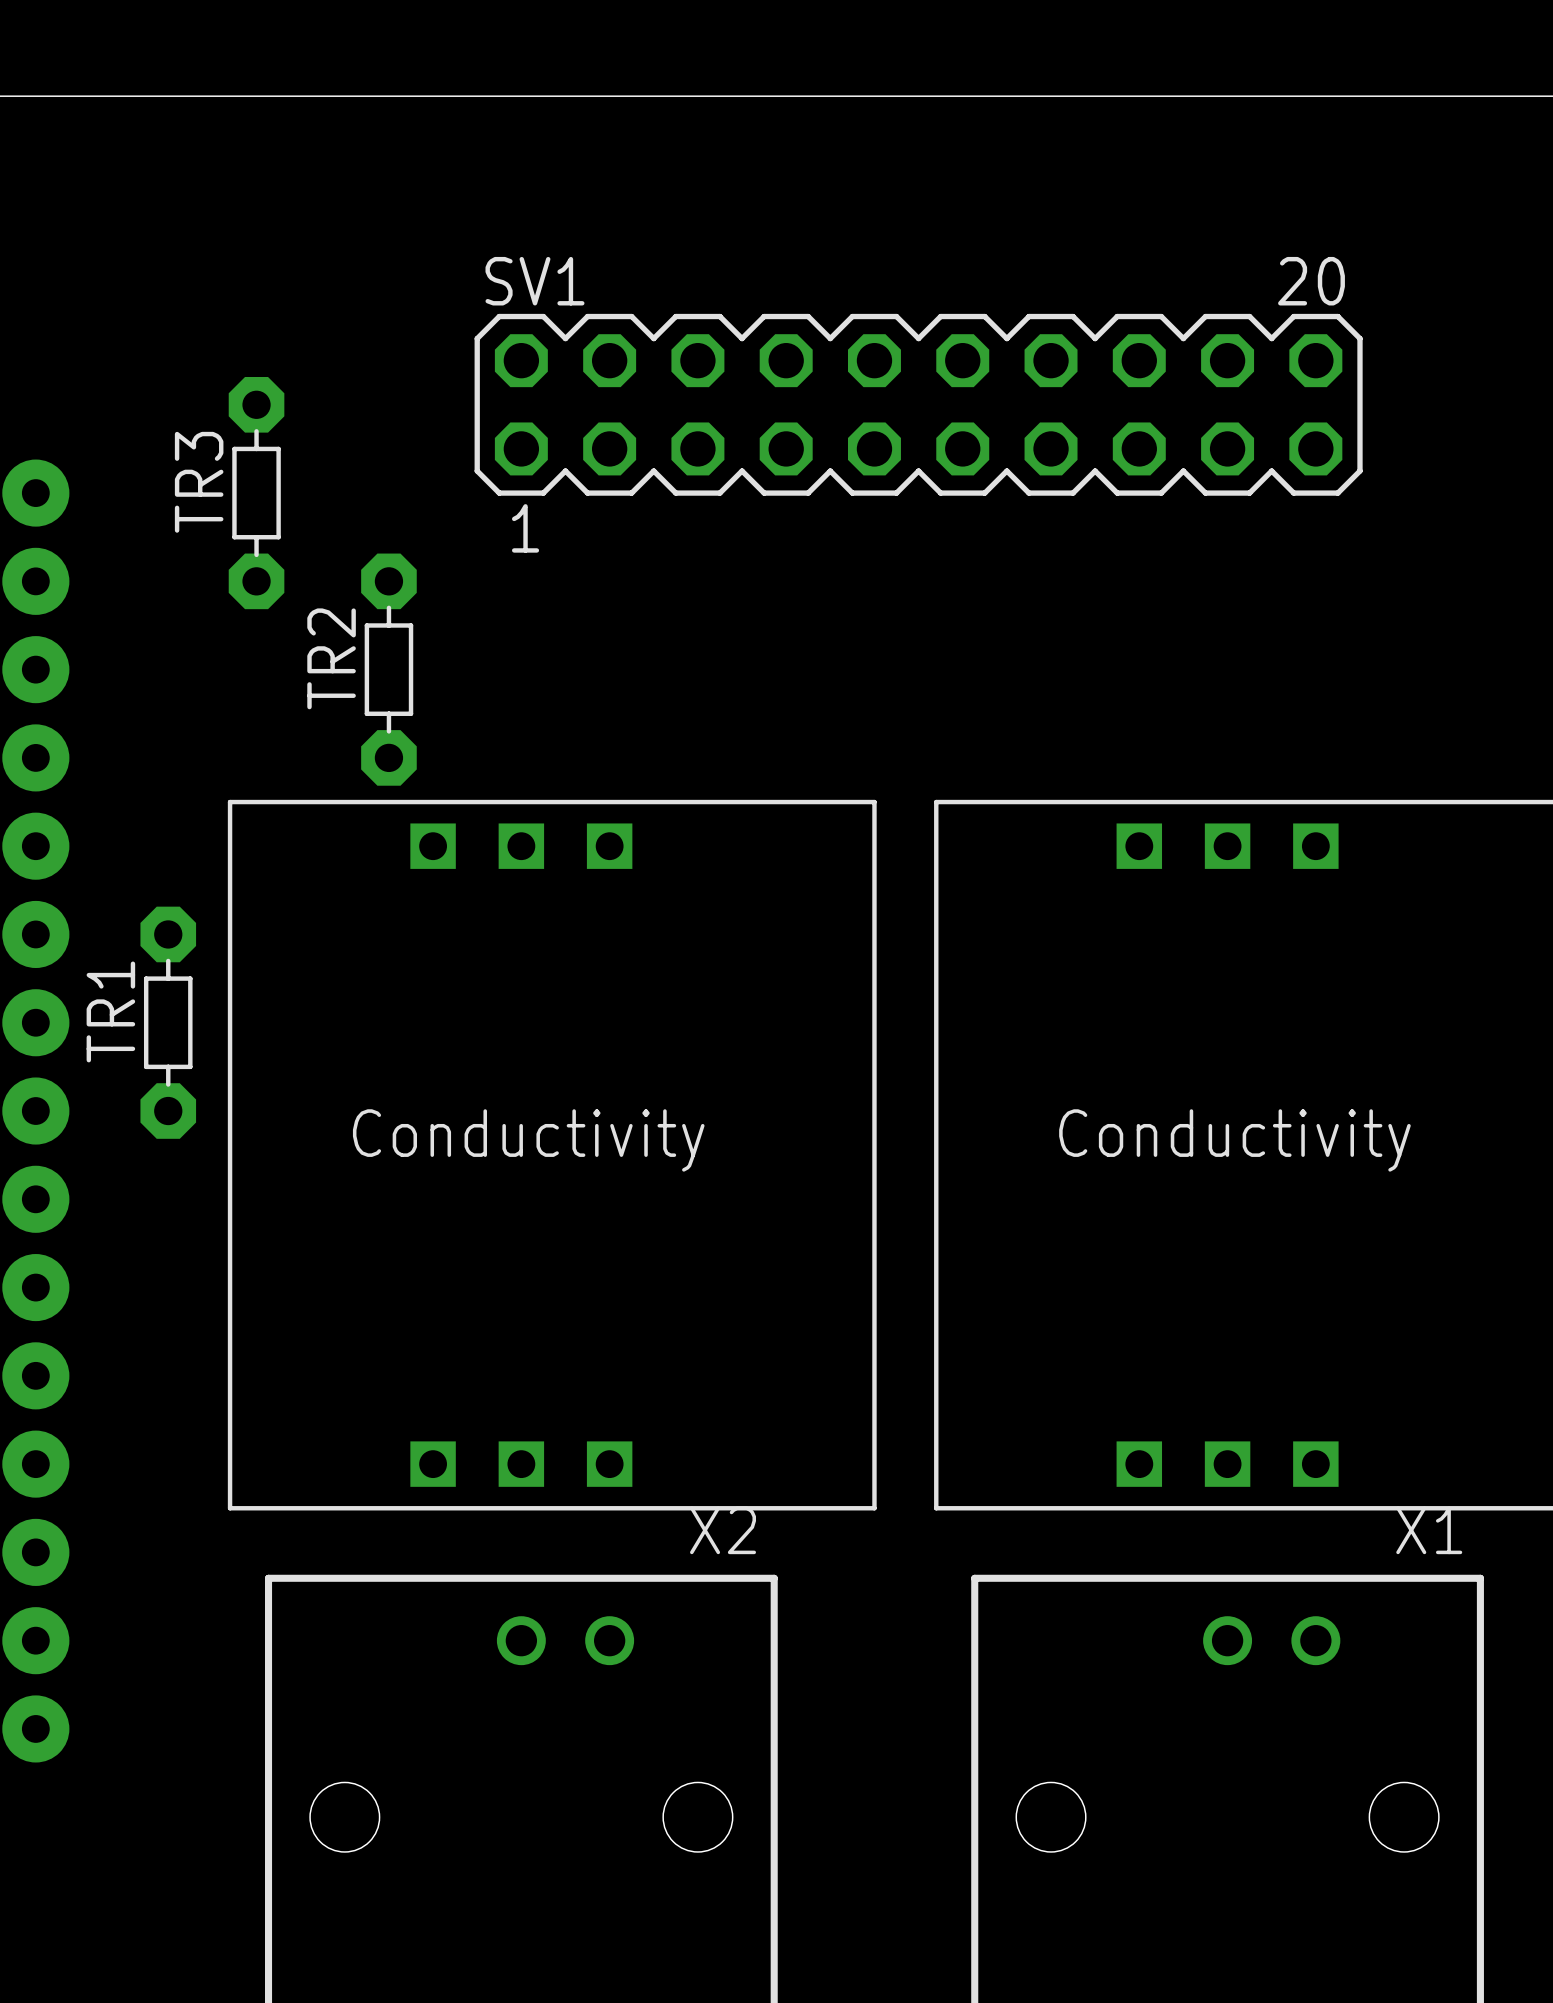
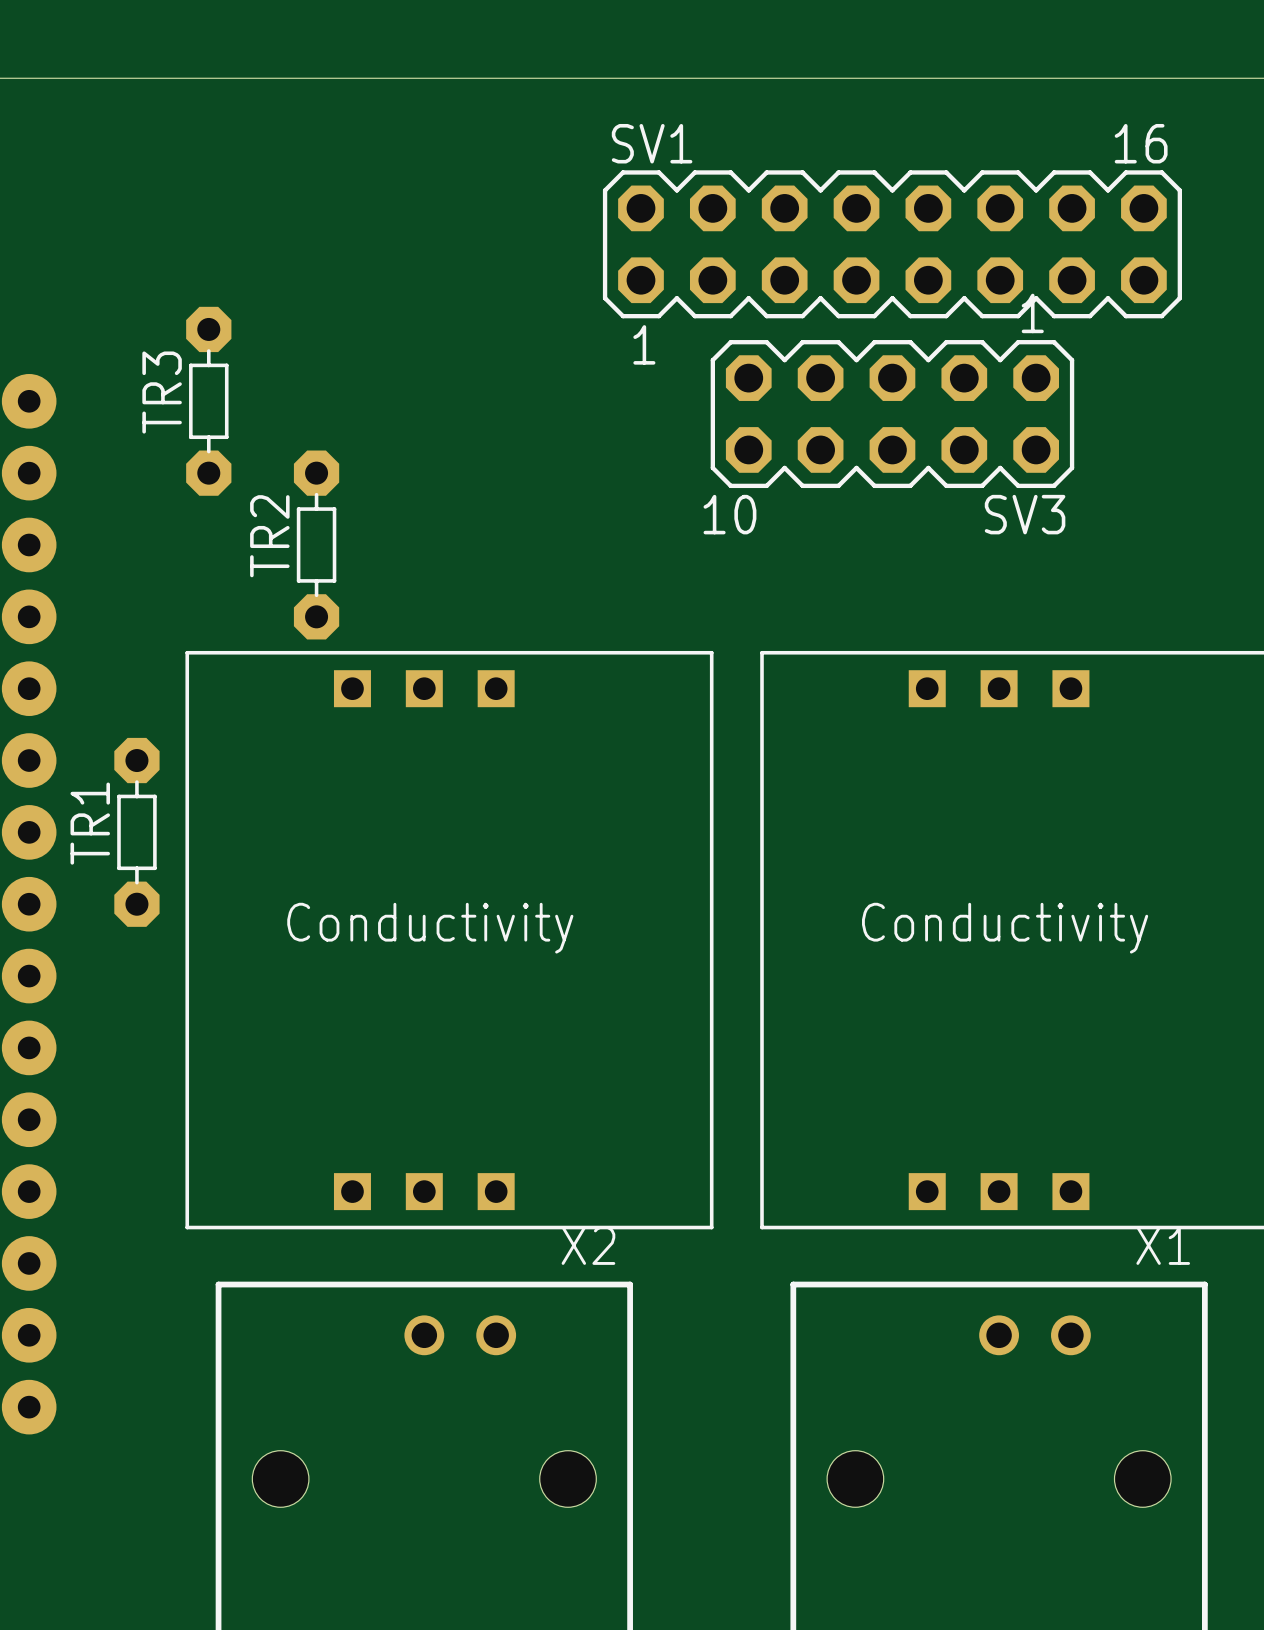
SV1 name position: SV1 (534, 281) -> SV1 (652, 143)
SV1 footprint: [474, 313, 1363, 496] -> [602, 170, 1182, 319]
SV3: none -> (892, 414)

